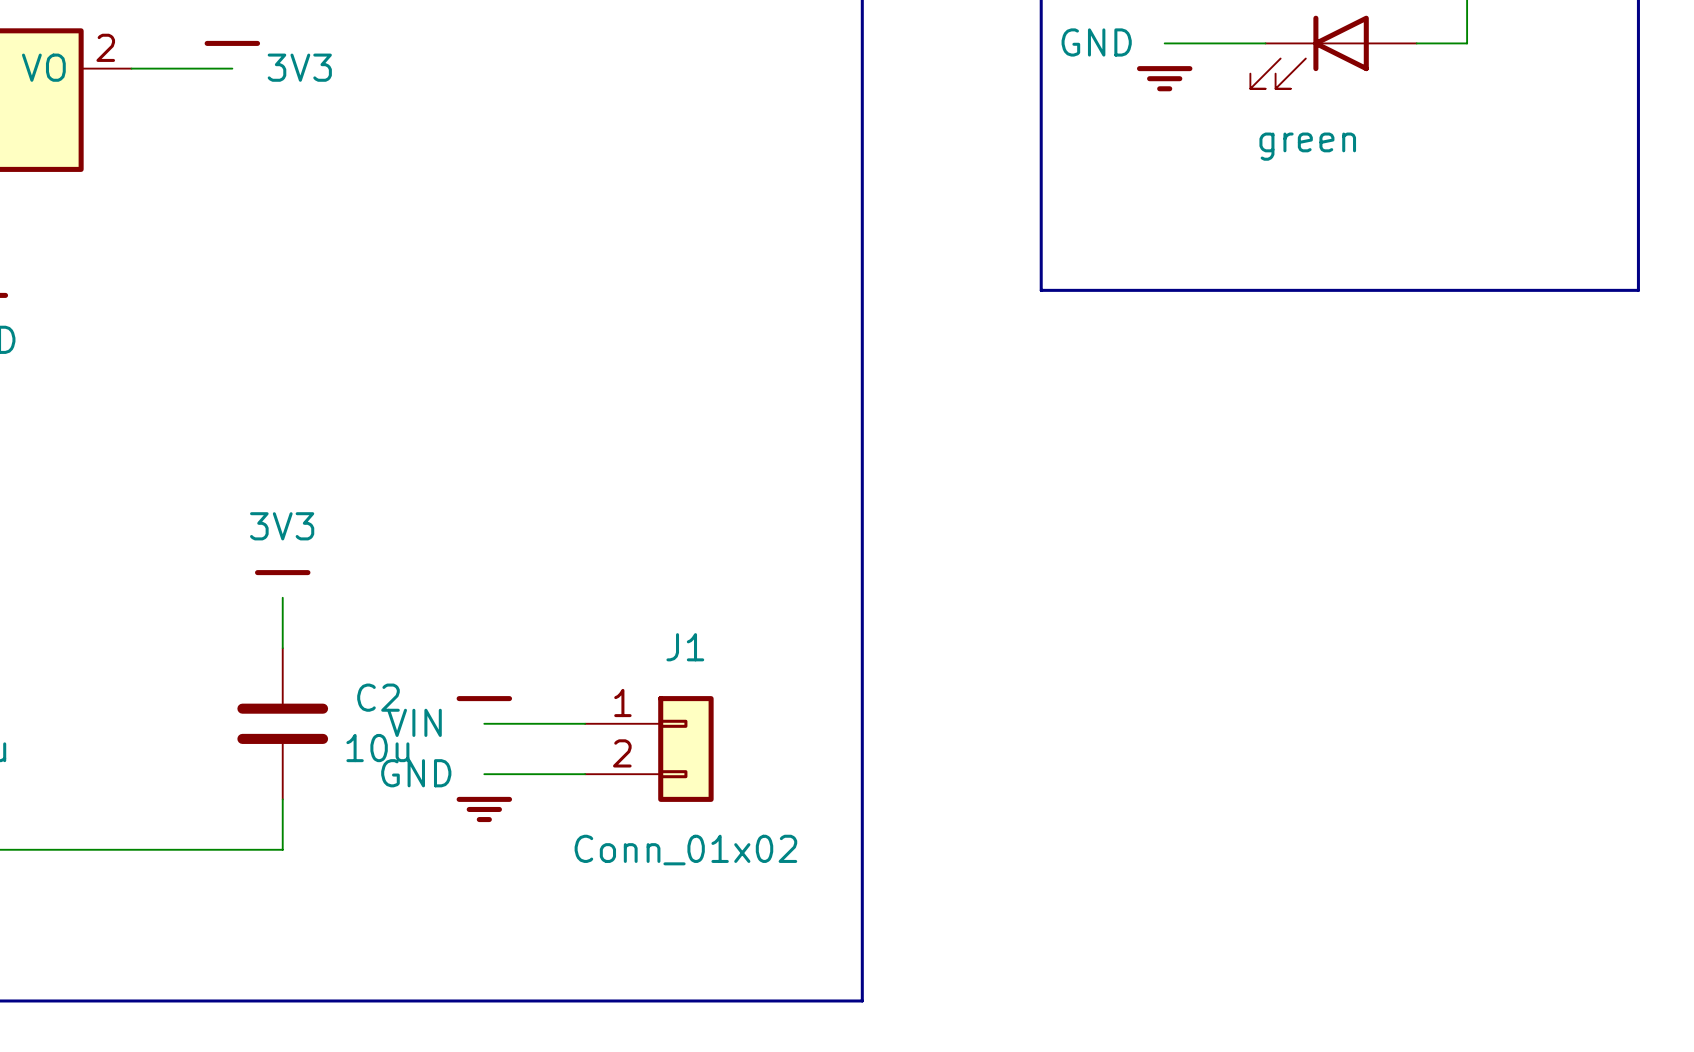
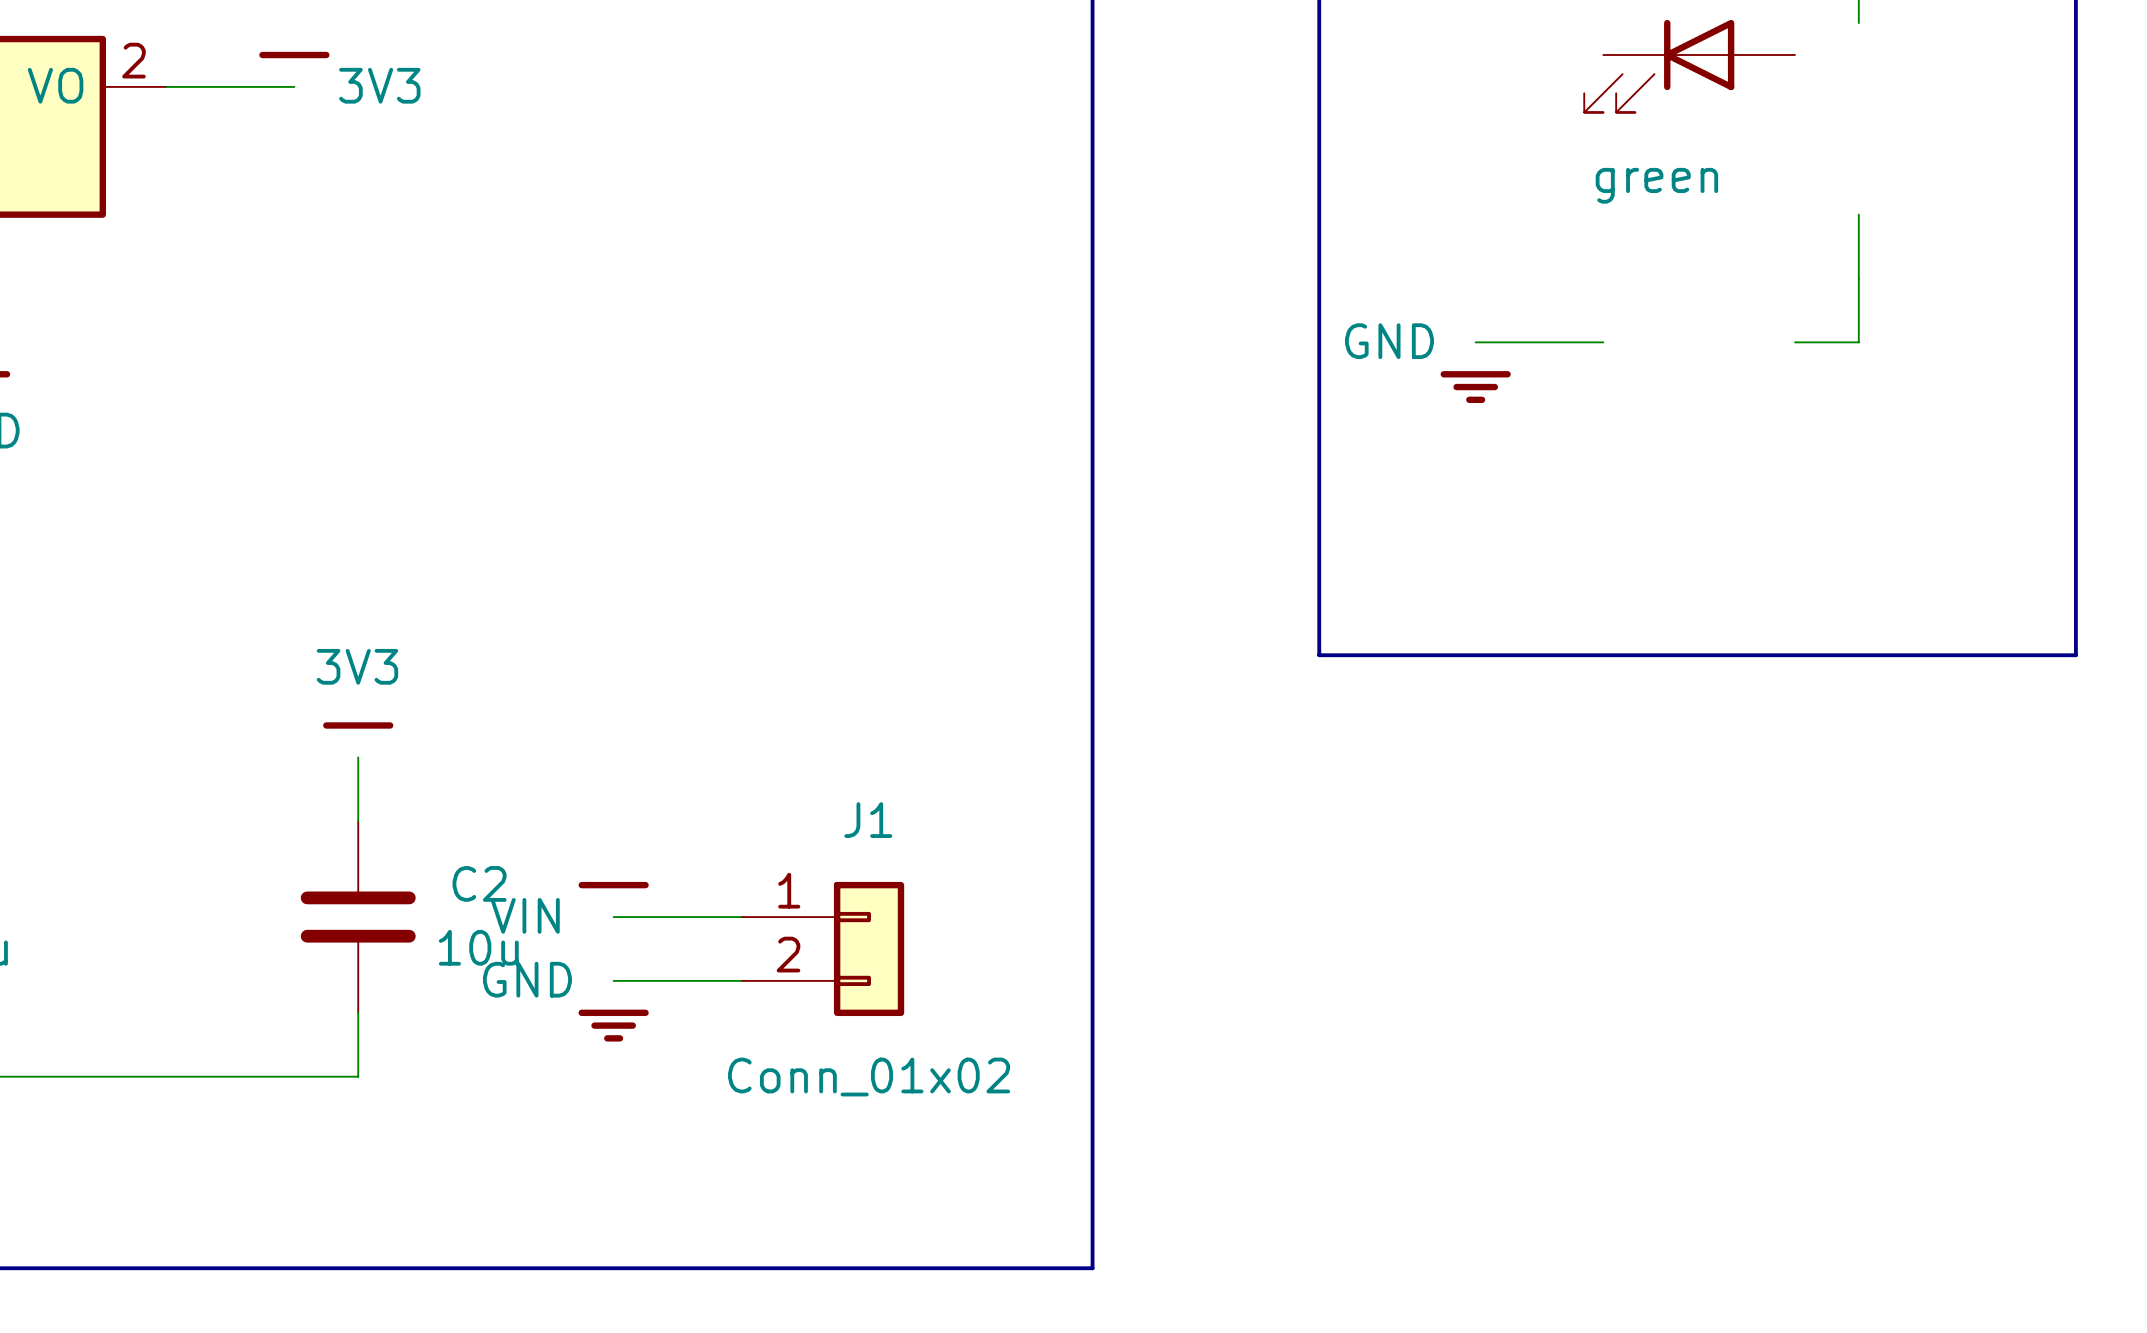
wire: (1467, 18) (1467, 43) (1416, 43) -> none
wire: (1164, 43) (1265, 43) -> (1475, 342) (1603, 342)
power symbol position: GND (1164, 78) -> GND (1475, 387)
wire: none -> (1858, 214) (1858, 342) (1794, 342)
line: (1041, 290) (1638, 290) -> (1319, 367) (1319, 655) (2075, 655) (2075, 367)

